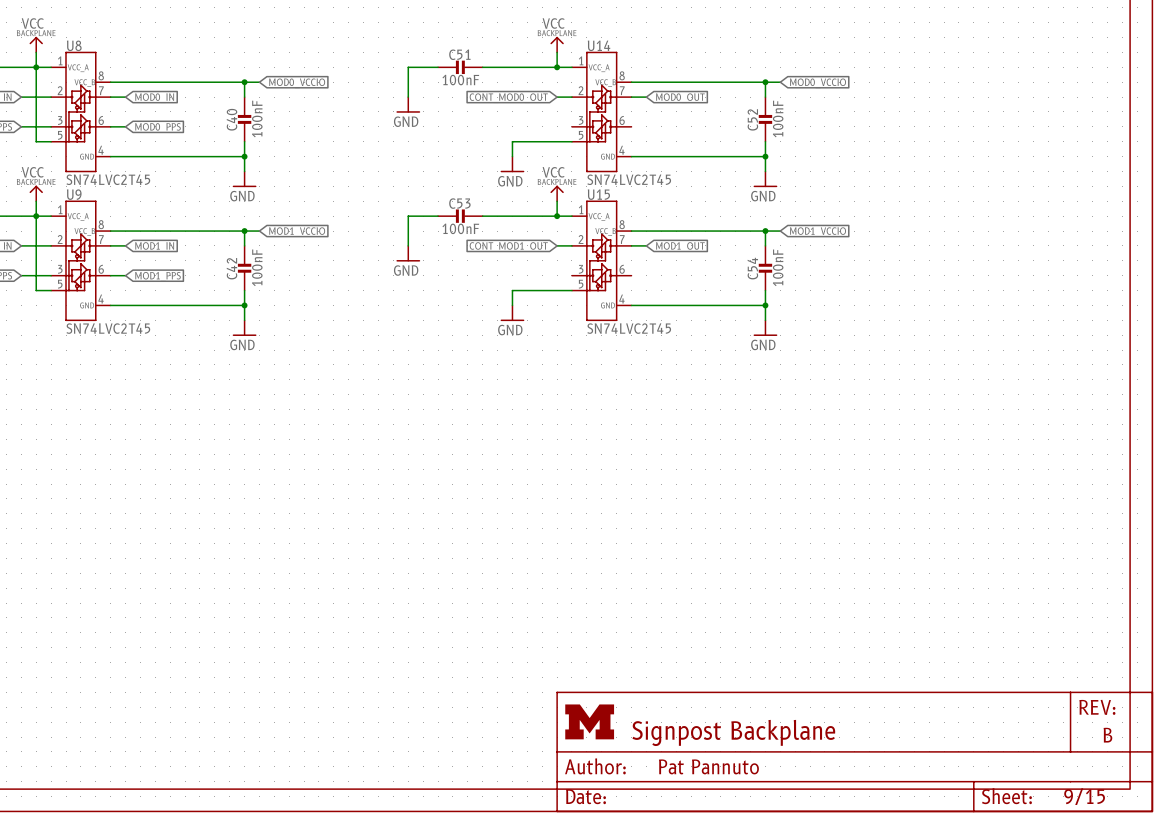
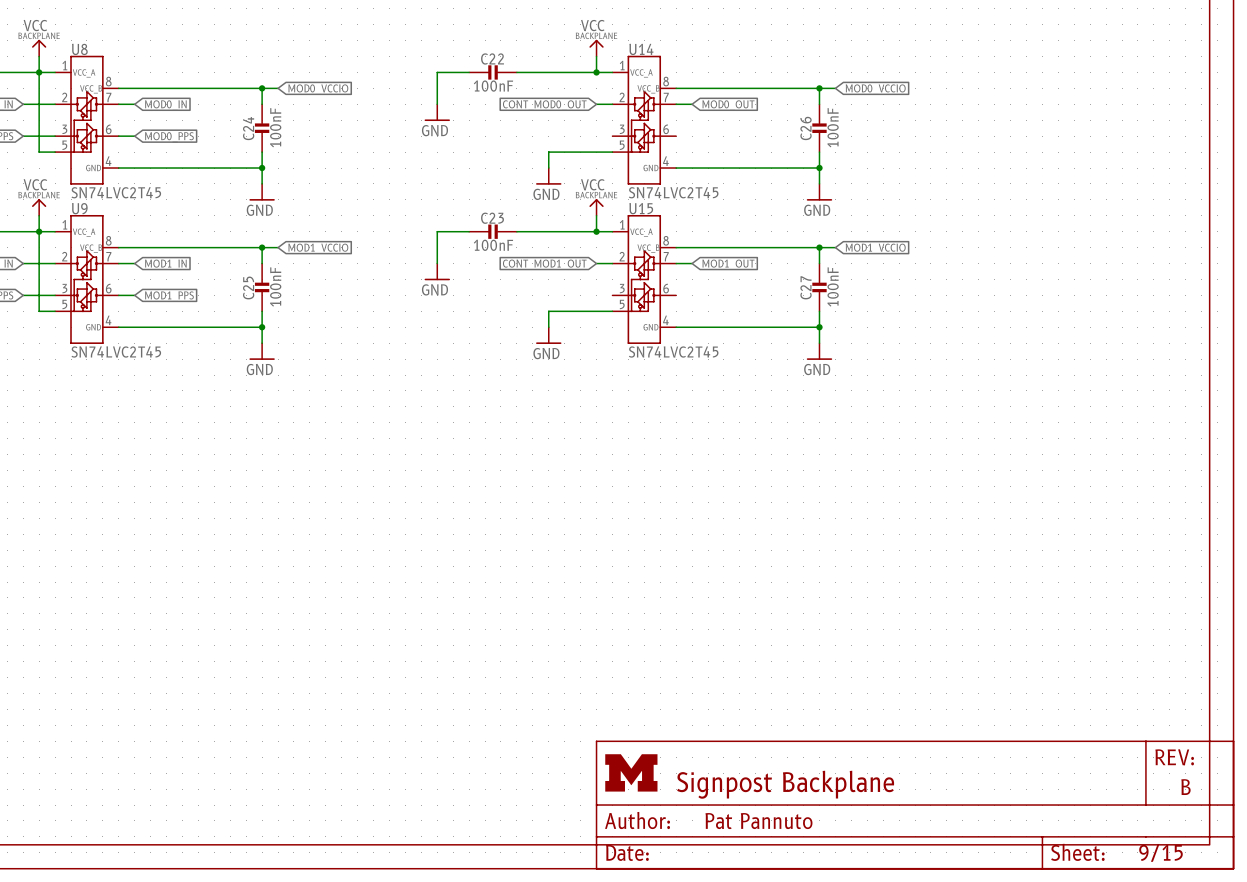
C51 name: C51 (459, 54) -> C22 (492, 58)
C40 name: C40 (231, 119) -> C24 (248, 128)
C52 name: C52 (752, 119) -> C26 (806, 128)
C53 name: C53 (459, 203) -> C23 (492, 218)
C42 name: C42 (231, 268) -> C25 (248, 287)
C54 name: C54 (752, 268) -> C27 (806, 287)

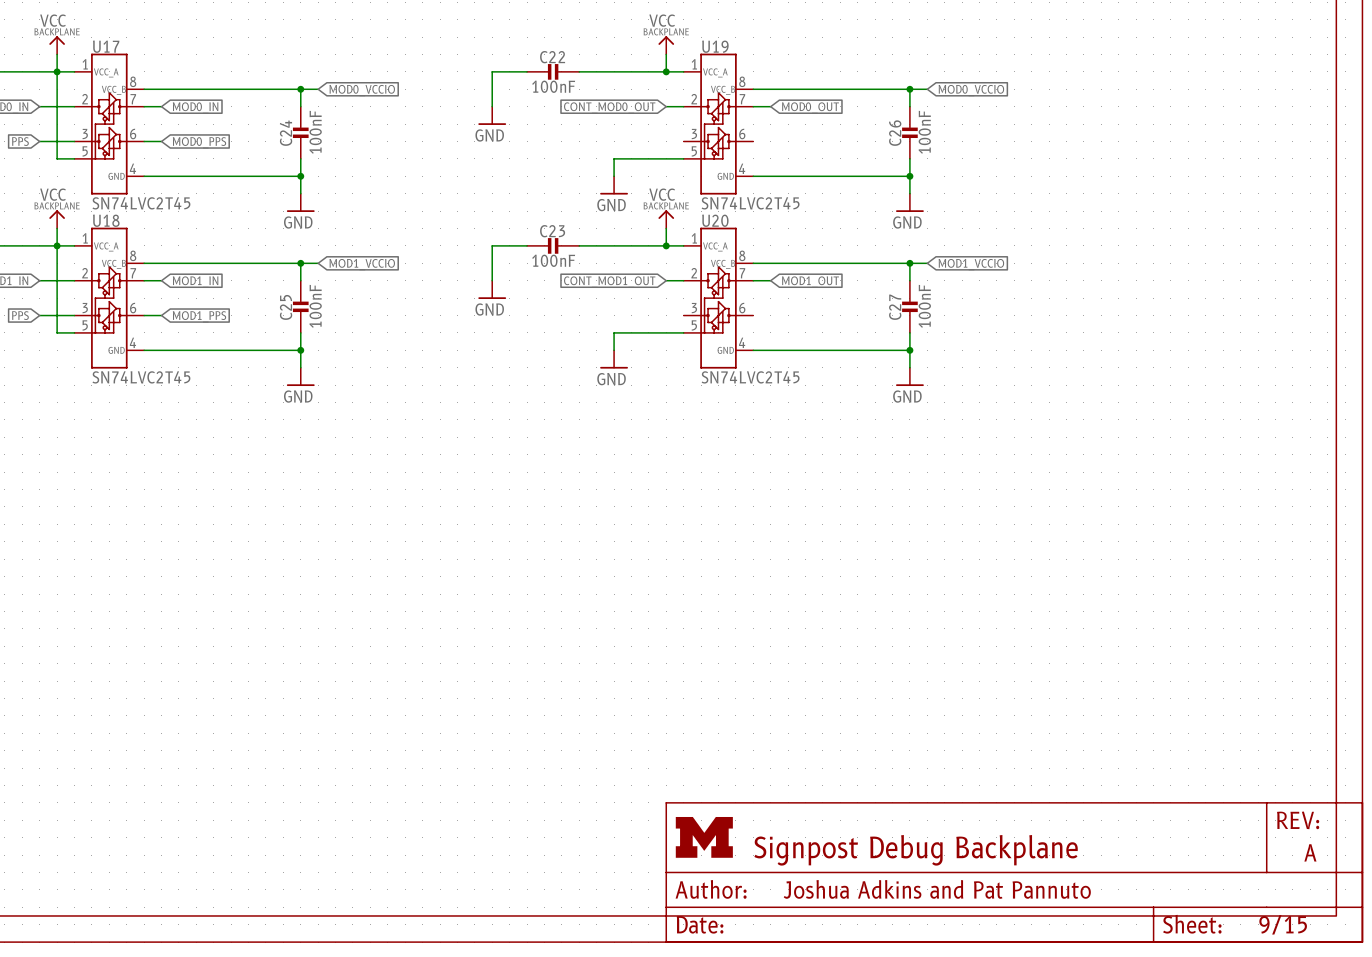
U8 name: U8 (79, 49) -> U17 (106, 46)
U14 name: U14 (641, 49) -> U19 (715, 46)
U9 name: U9 (79, 208) -> U18 (106, 220)
U15 name: U15 (641, 208) -> U20 (715, 220)
part text: Signpost Backplane (785, 784) -> Signpost Debug Backplane (916, 850)
part text: B (1185, 787) -> A (1310, 852)
part text: Pat Pannuto (758, 821) -> Joshua Adkins and Pat Pannuto (937, 889)

